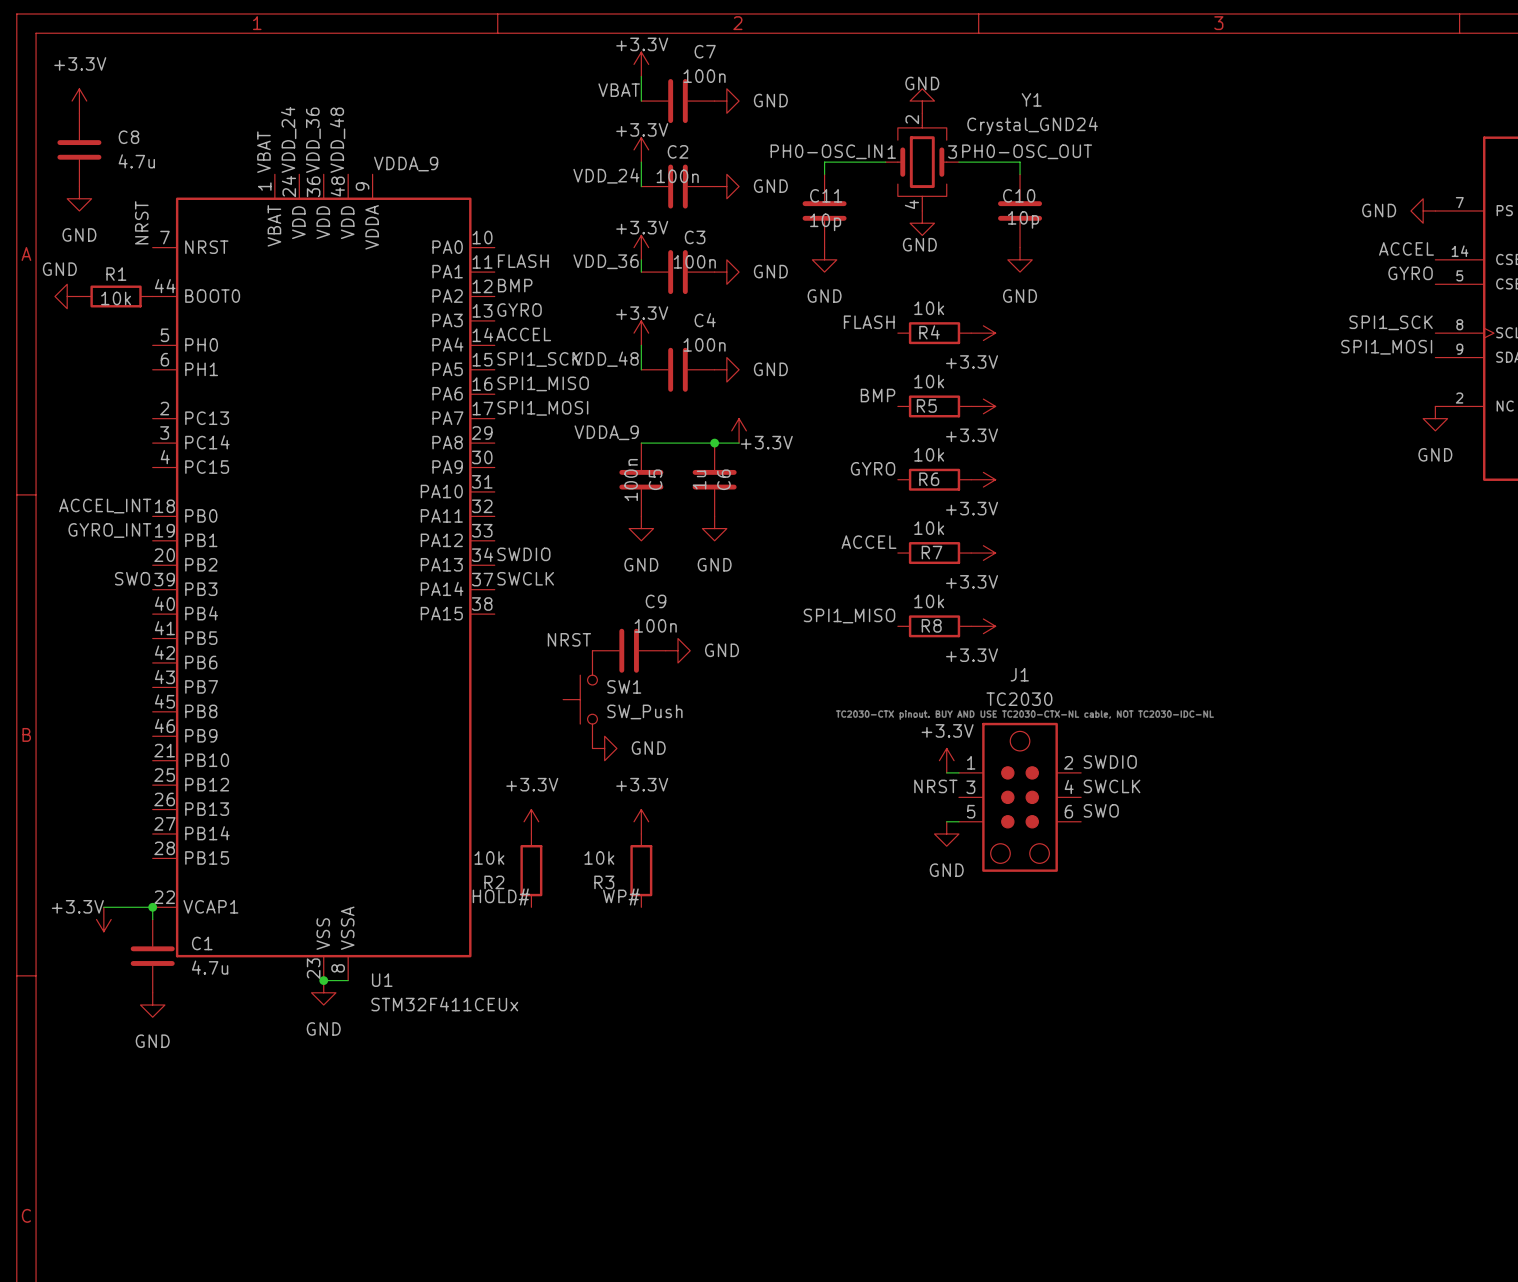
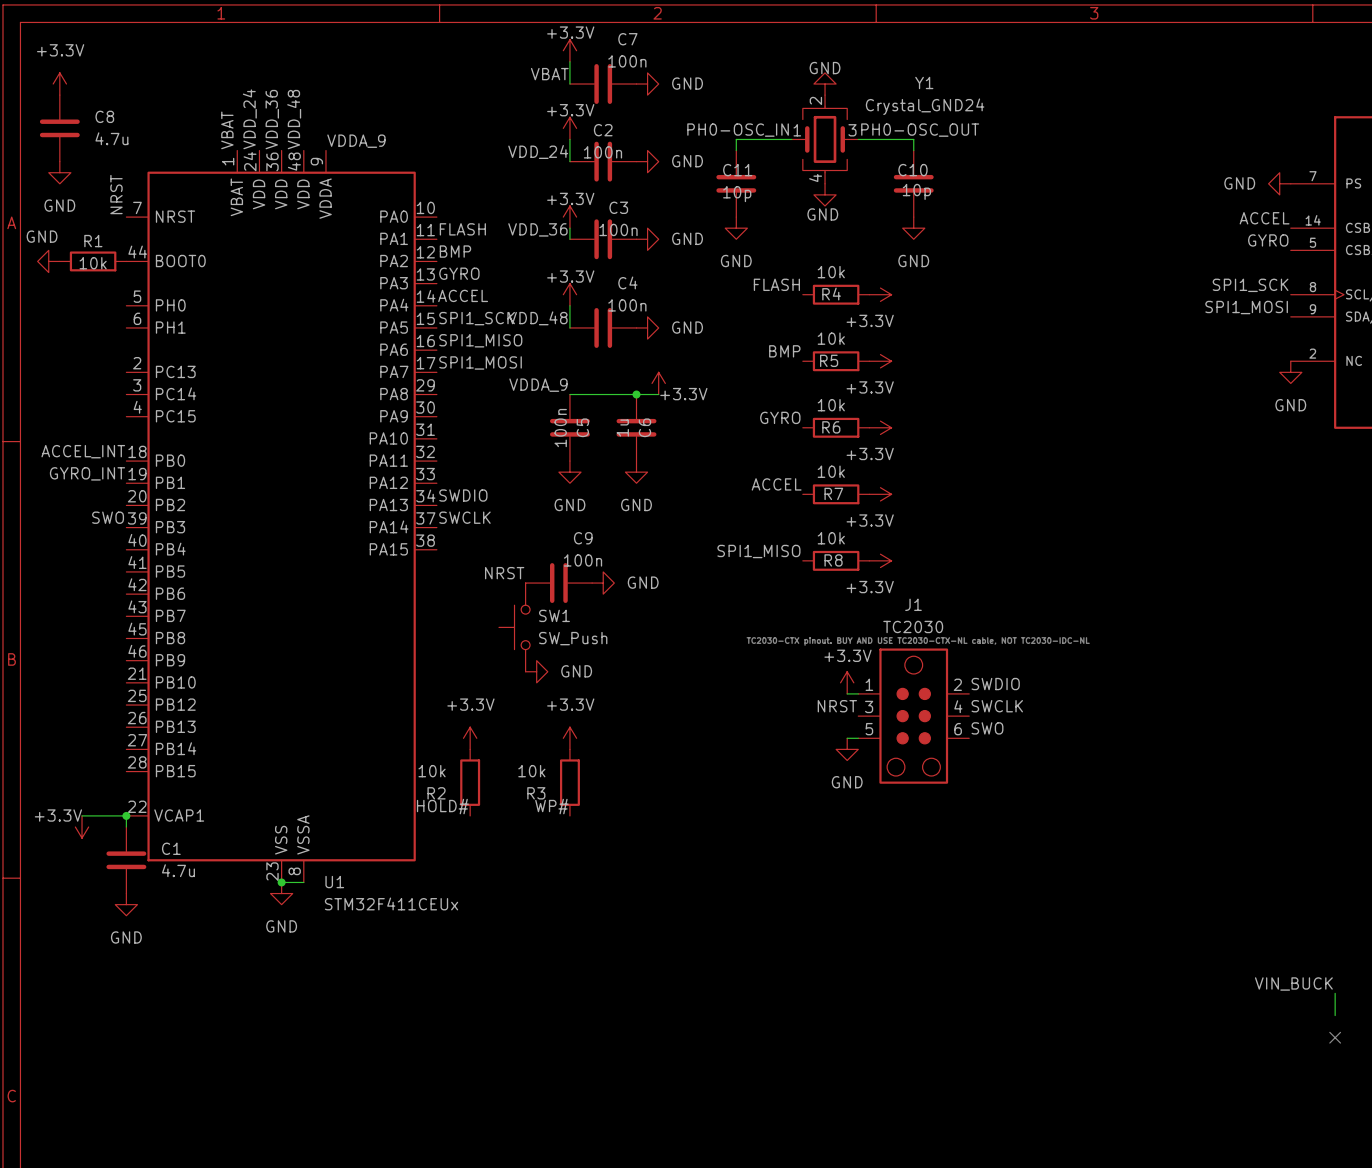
label: none -> VIN_BUCK (1293, 983)
wire: none -> (1335, 993) (1335, 1015)
no-connect mark: none -> (1335, 1037)

